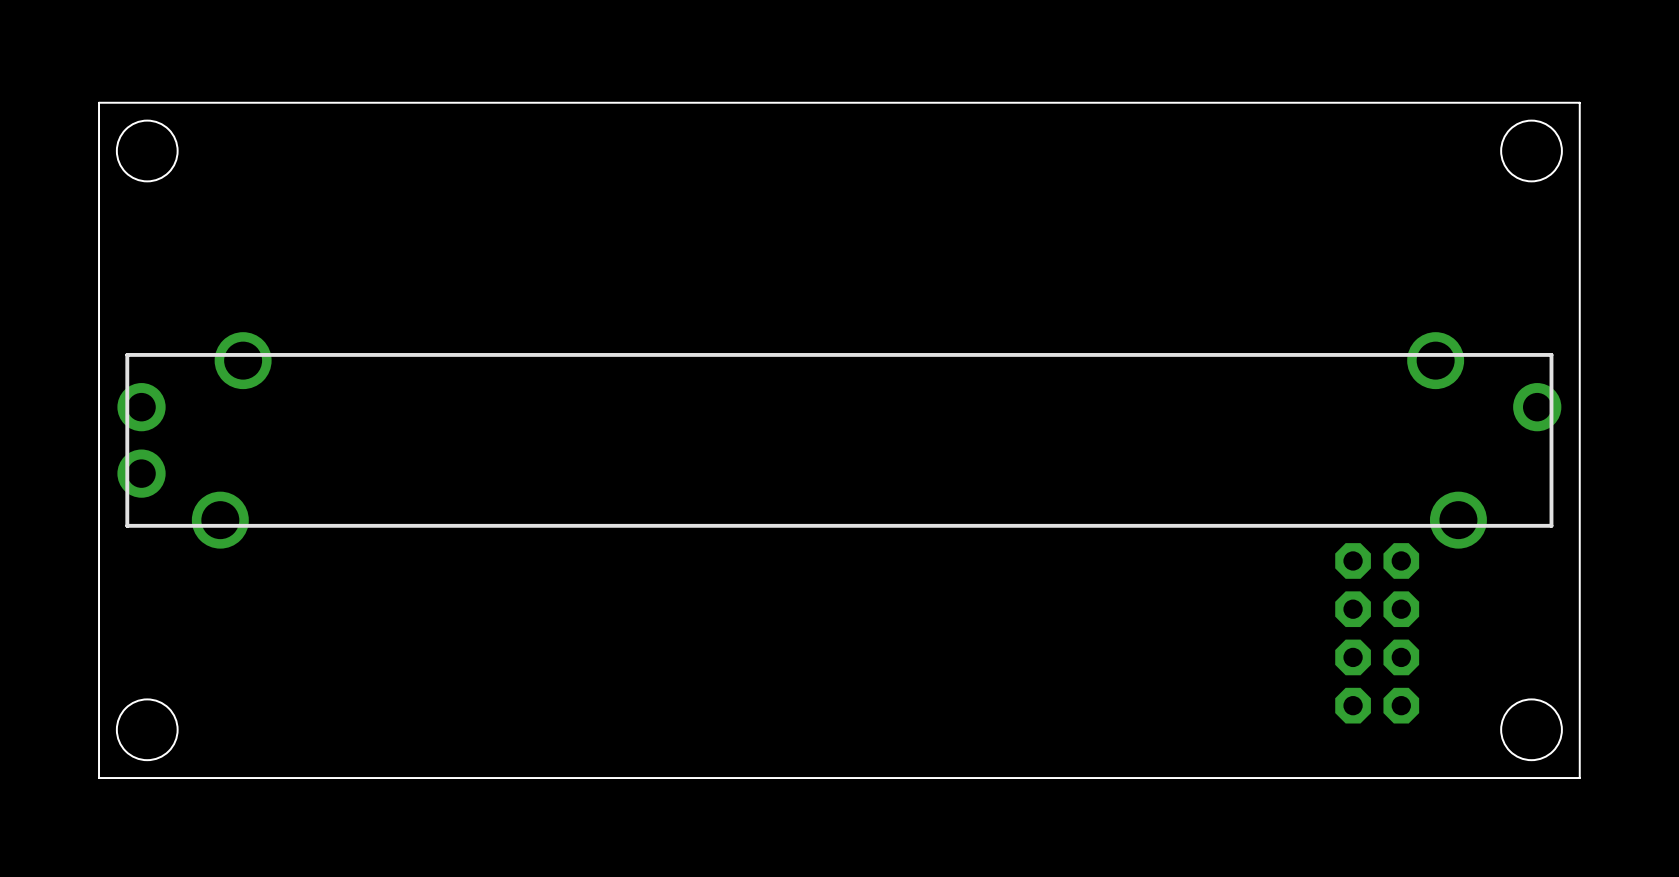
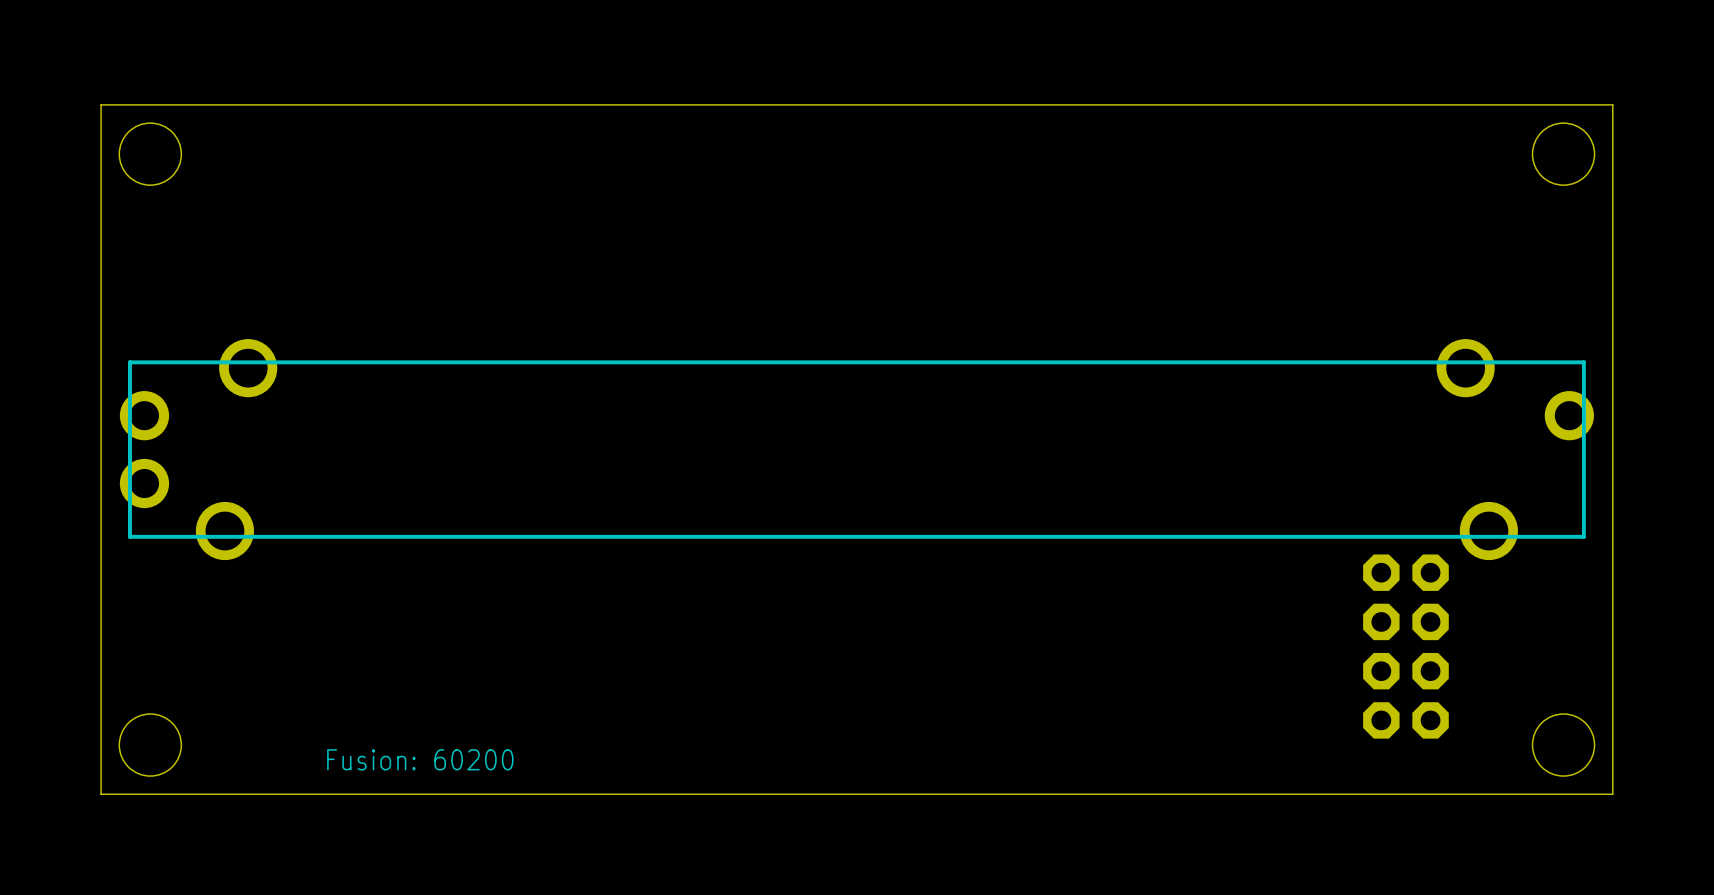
text: none -> Fusion: 60200 (420, 759)

